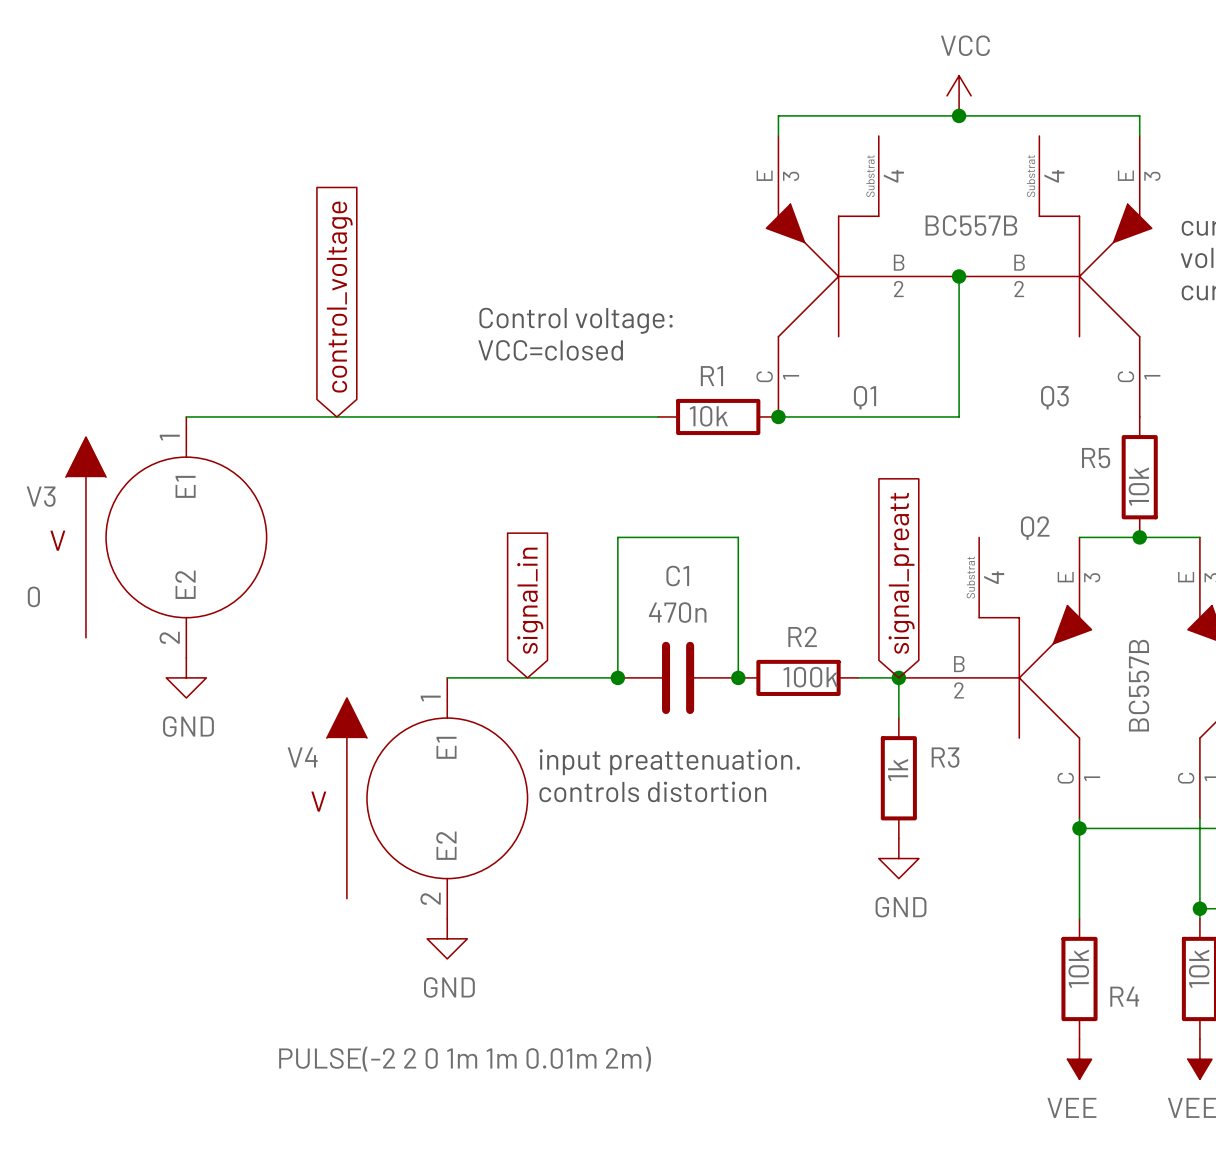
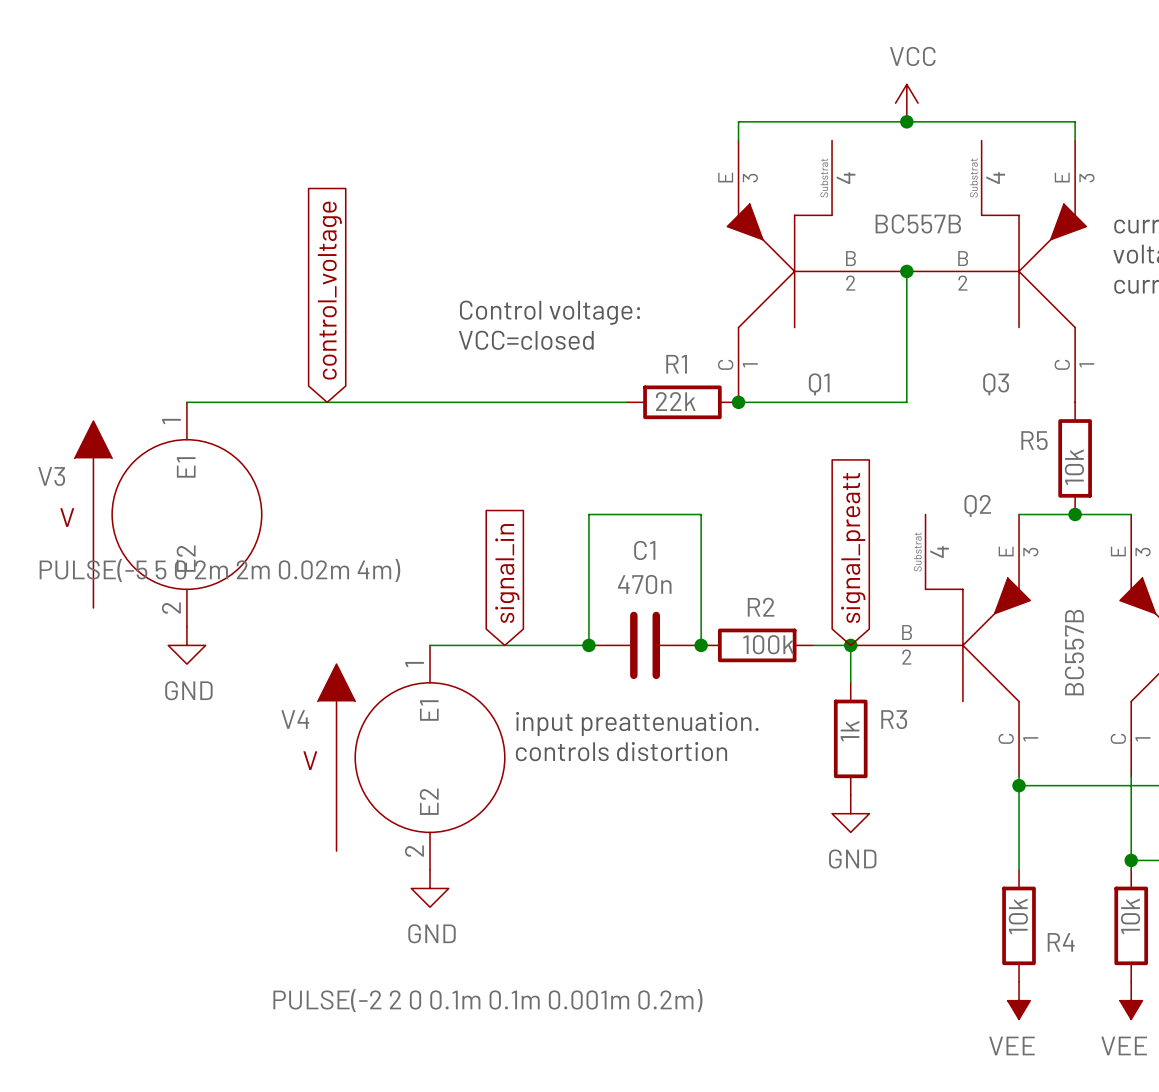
R1 value: 10k (708, 416) -> 22k (675, 401)
V3 value: 0 (33, 596) -> PULSE(-5 5 0 2m 2m 0.02m 4m) (219, 570)
V4 value: PULSE(-2 2 0 1m 1m 0.01m 2m) (465, 1059) -> PULSE(-2 2 0 0.1m 0.1m 0.001m 0.2m) (487, 1000)

